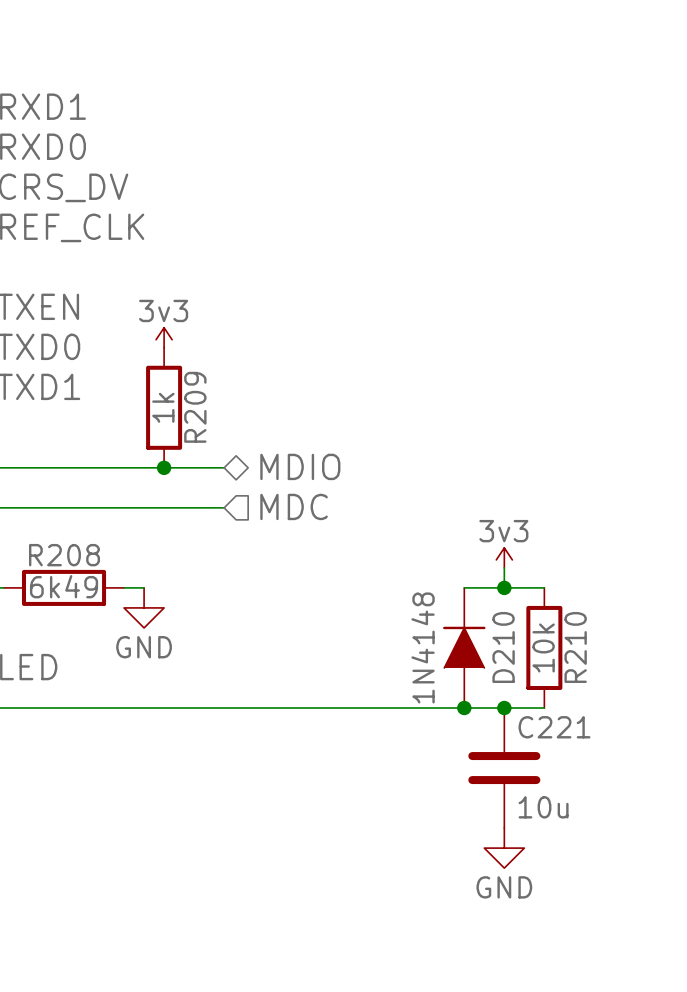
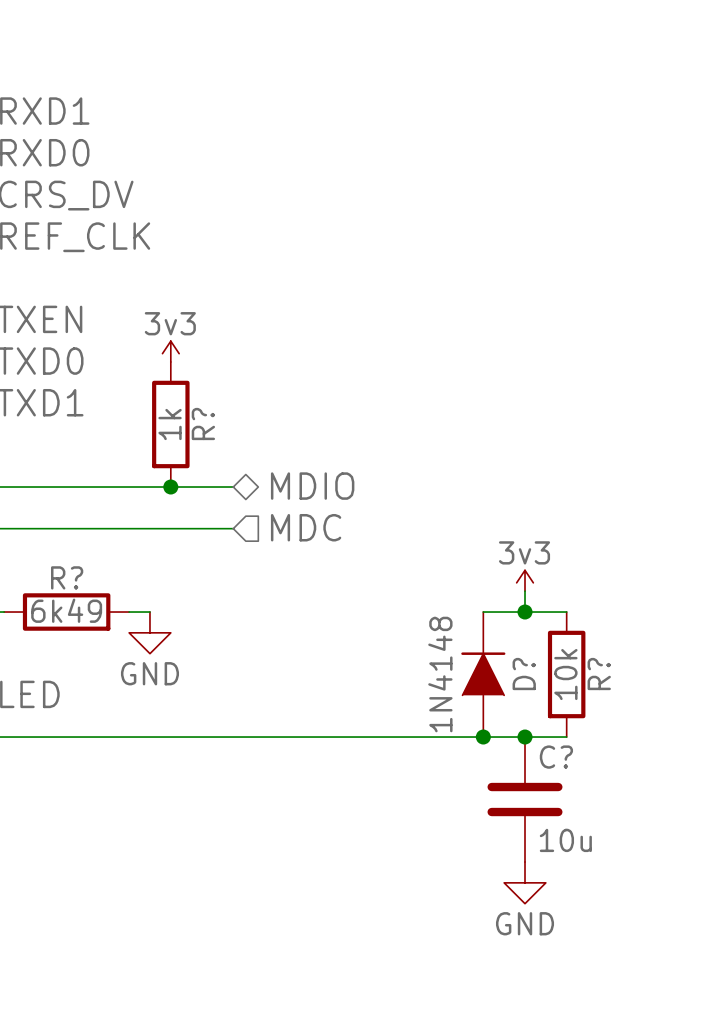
R209 name: R209 (195, 407) -> R? (203, 424)
R208 name: R208 (64, 555) -> R? (67, 577)
D210 name: D210 (503, 647) -> D? (524, 674)
R210 name: R210 (575, 647) -> R? (599, 674)
C221 name: C221 (554, 727) -> C? (556, 757)

